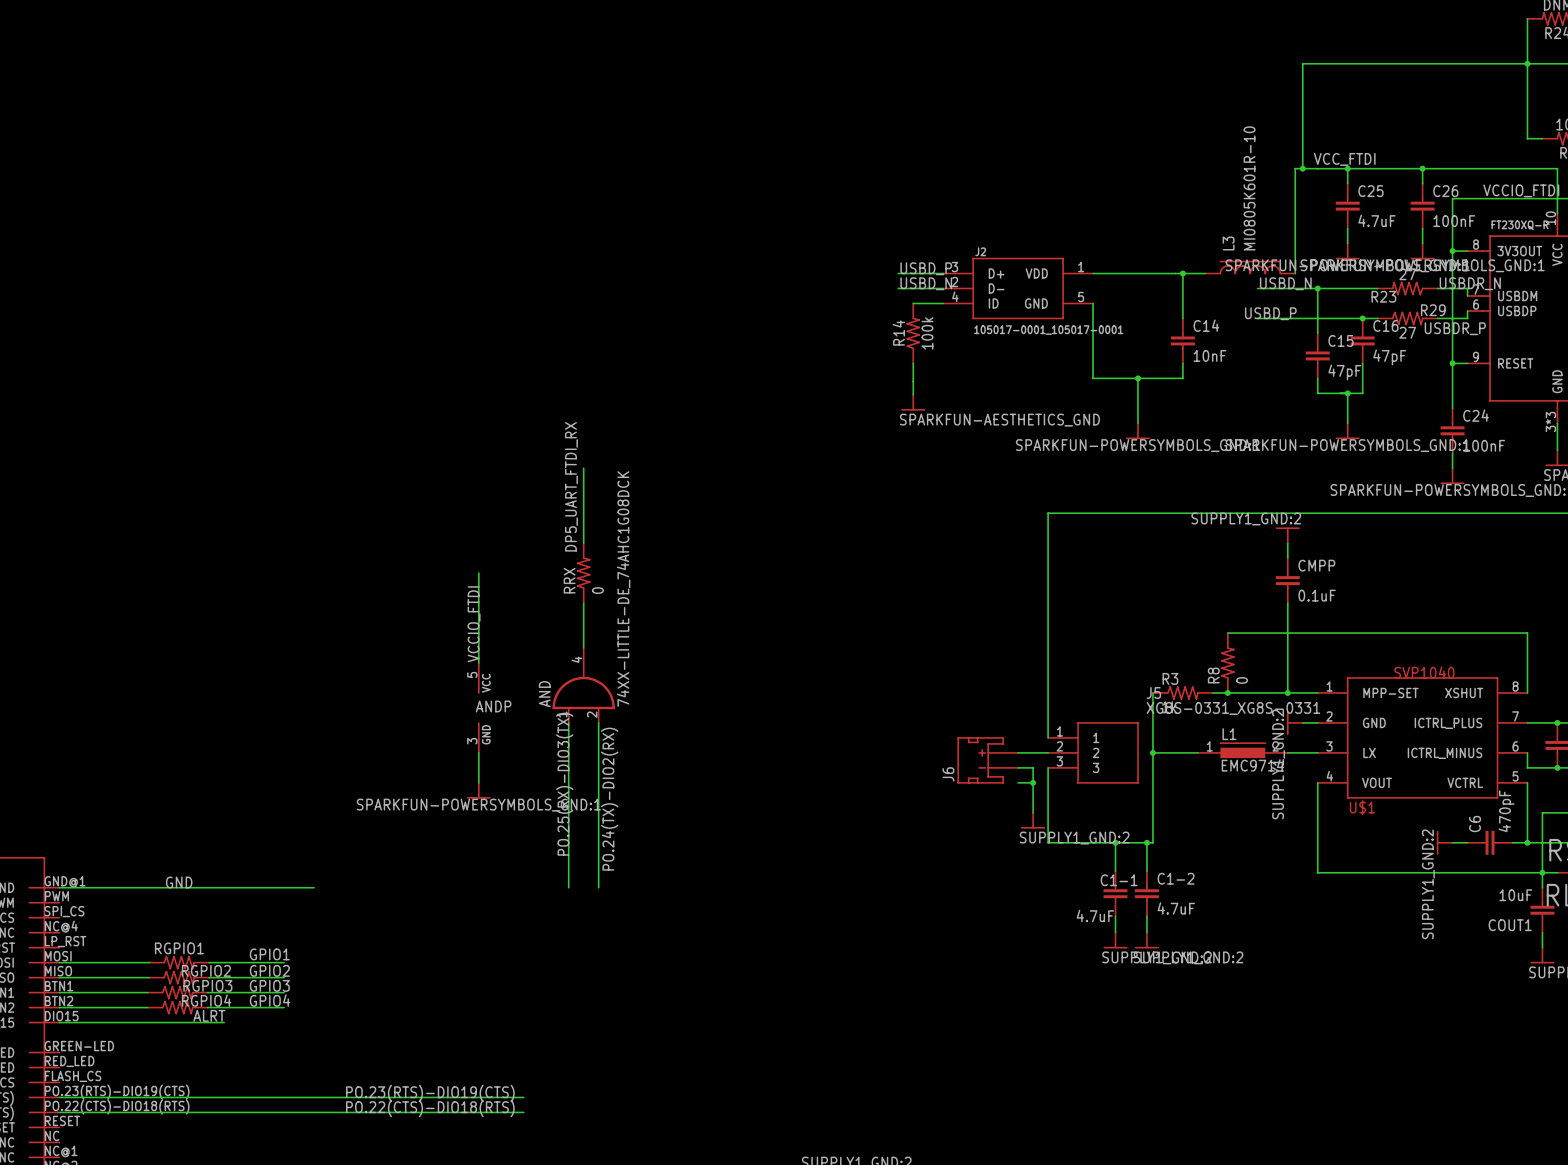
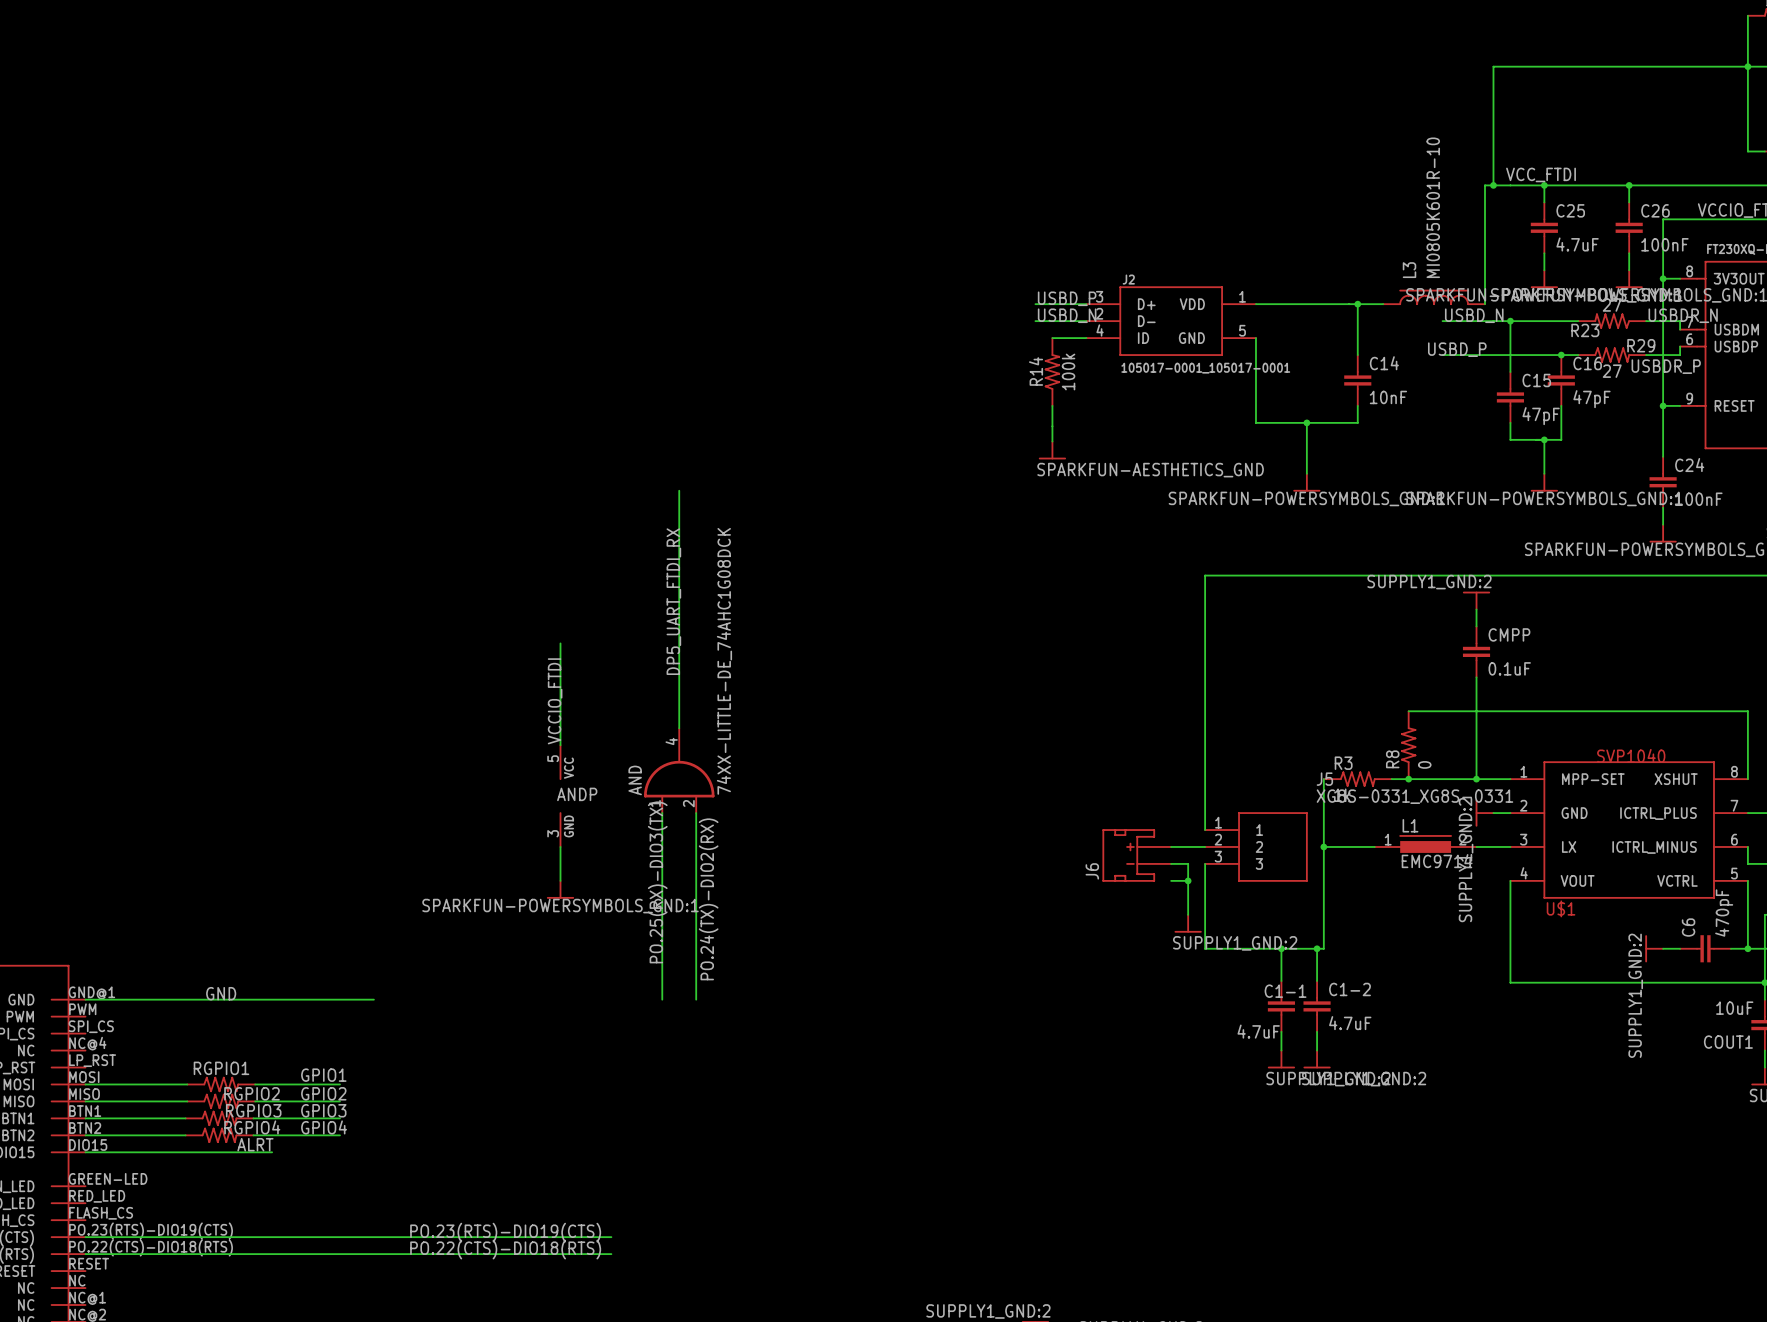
wire: none -> (679, 490) (679, 524)
label position: DP5_UART_FTDI_RX (571, 486) -> DP5_UART_FTDI_RX (673, 601)
RRX: 0 (583, 573) -> none

